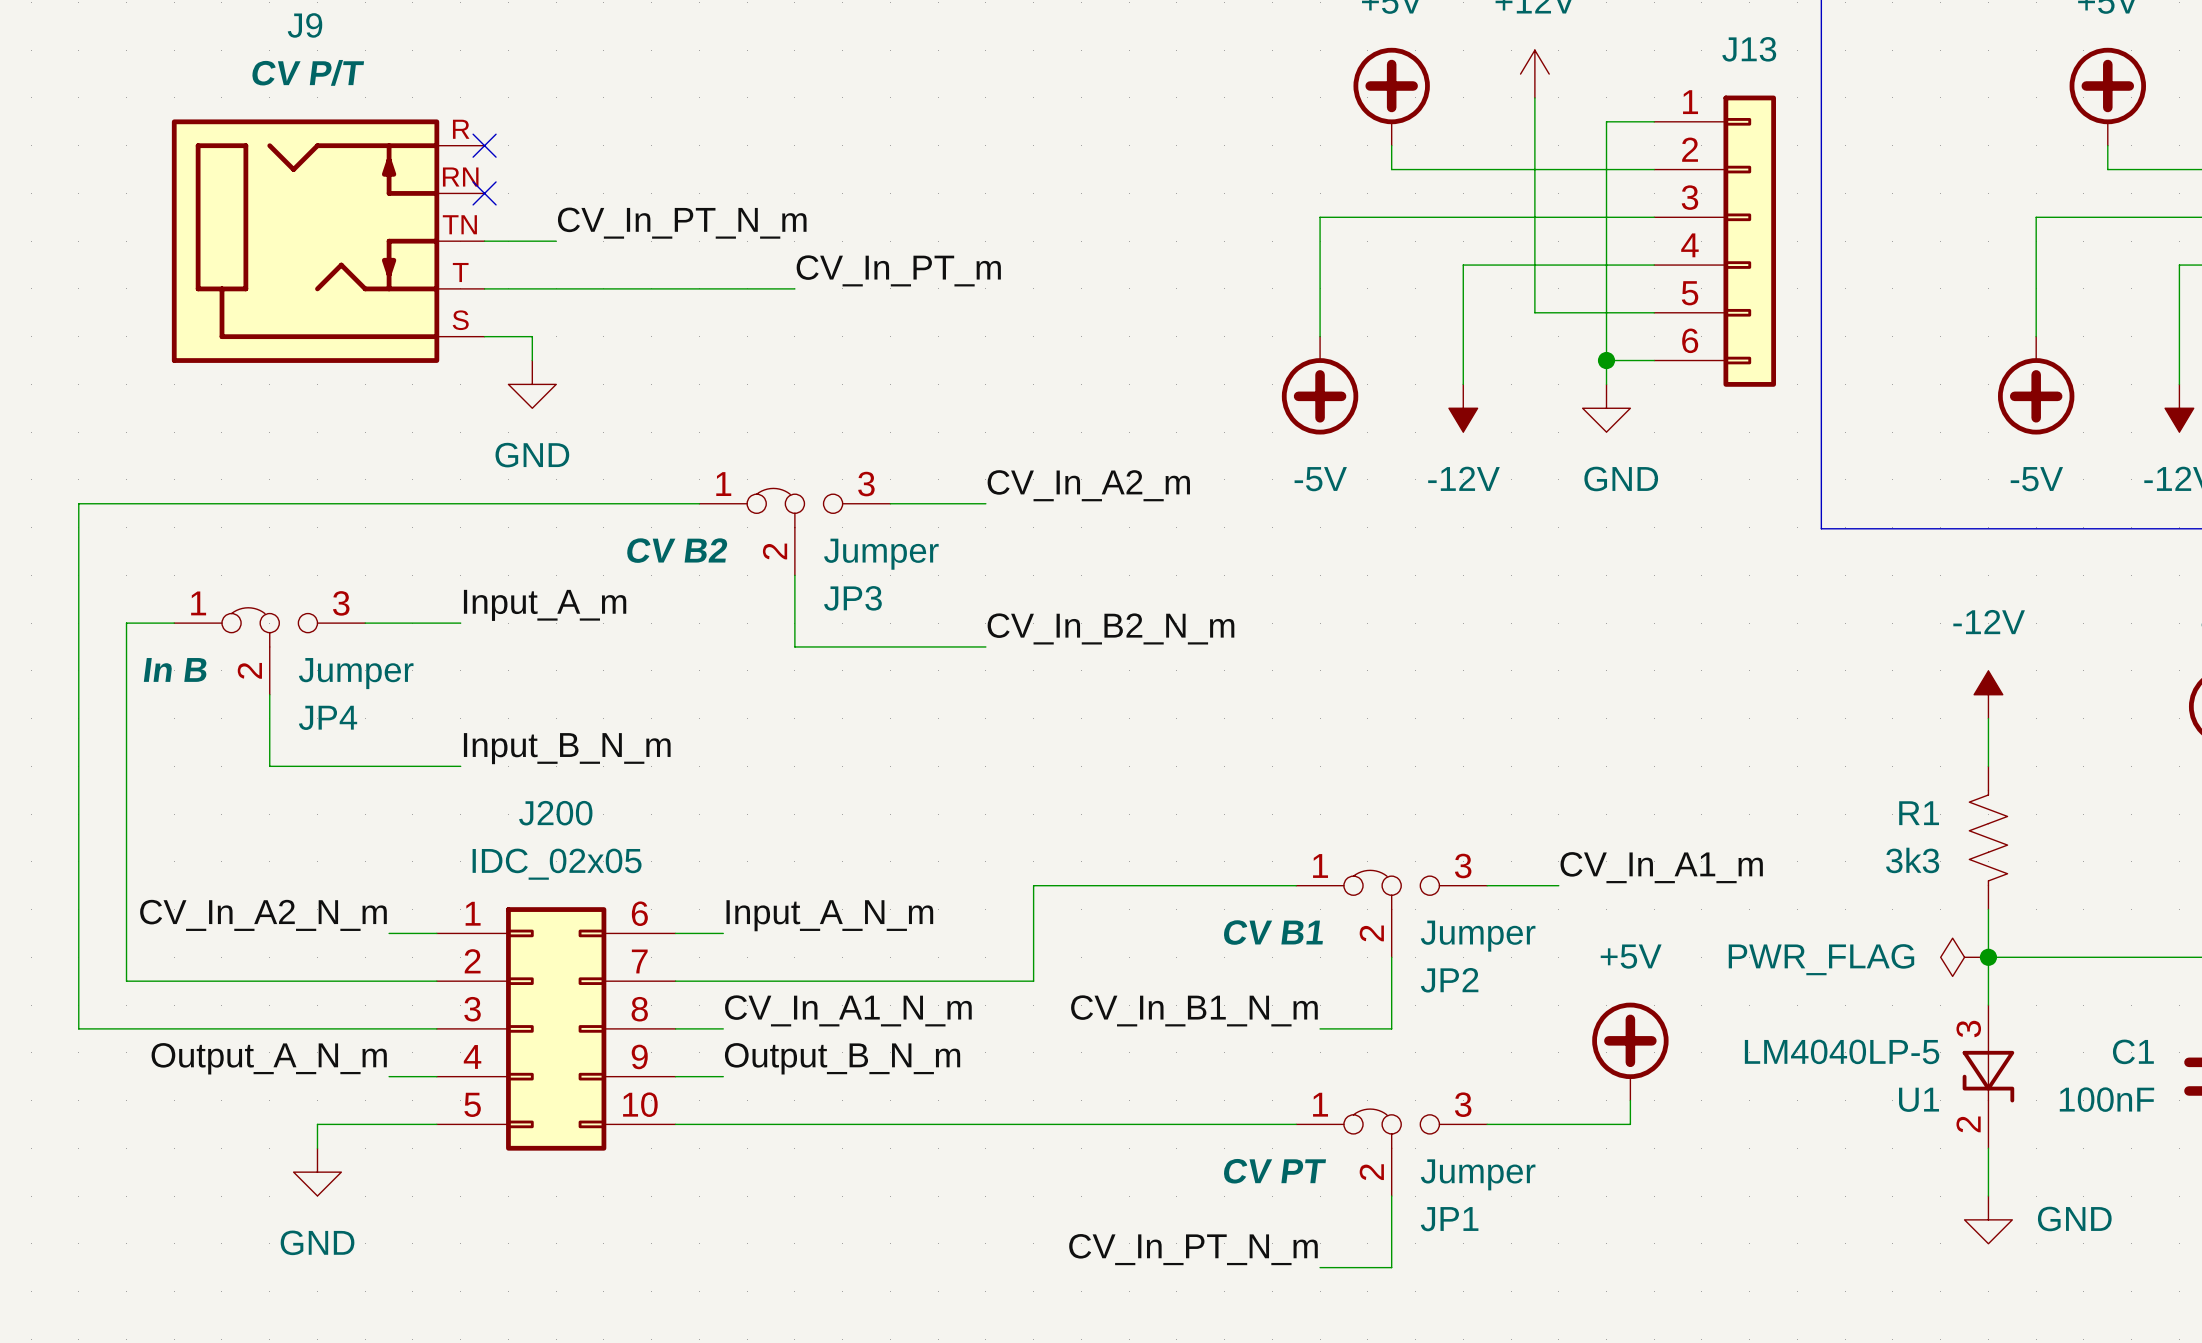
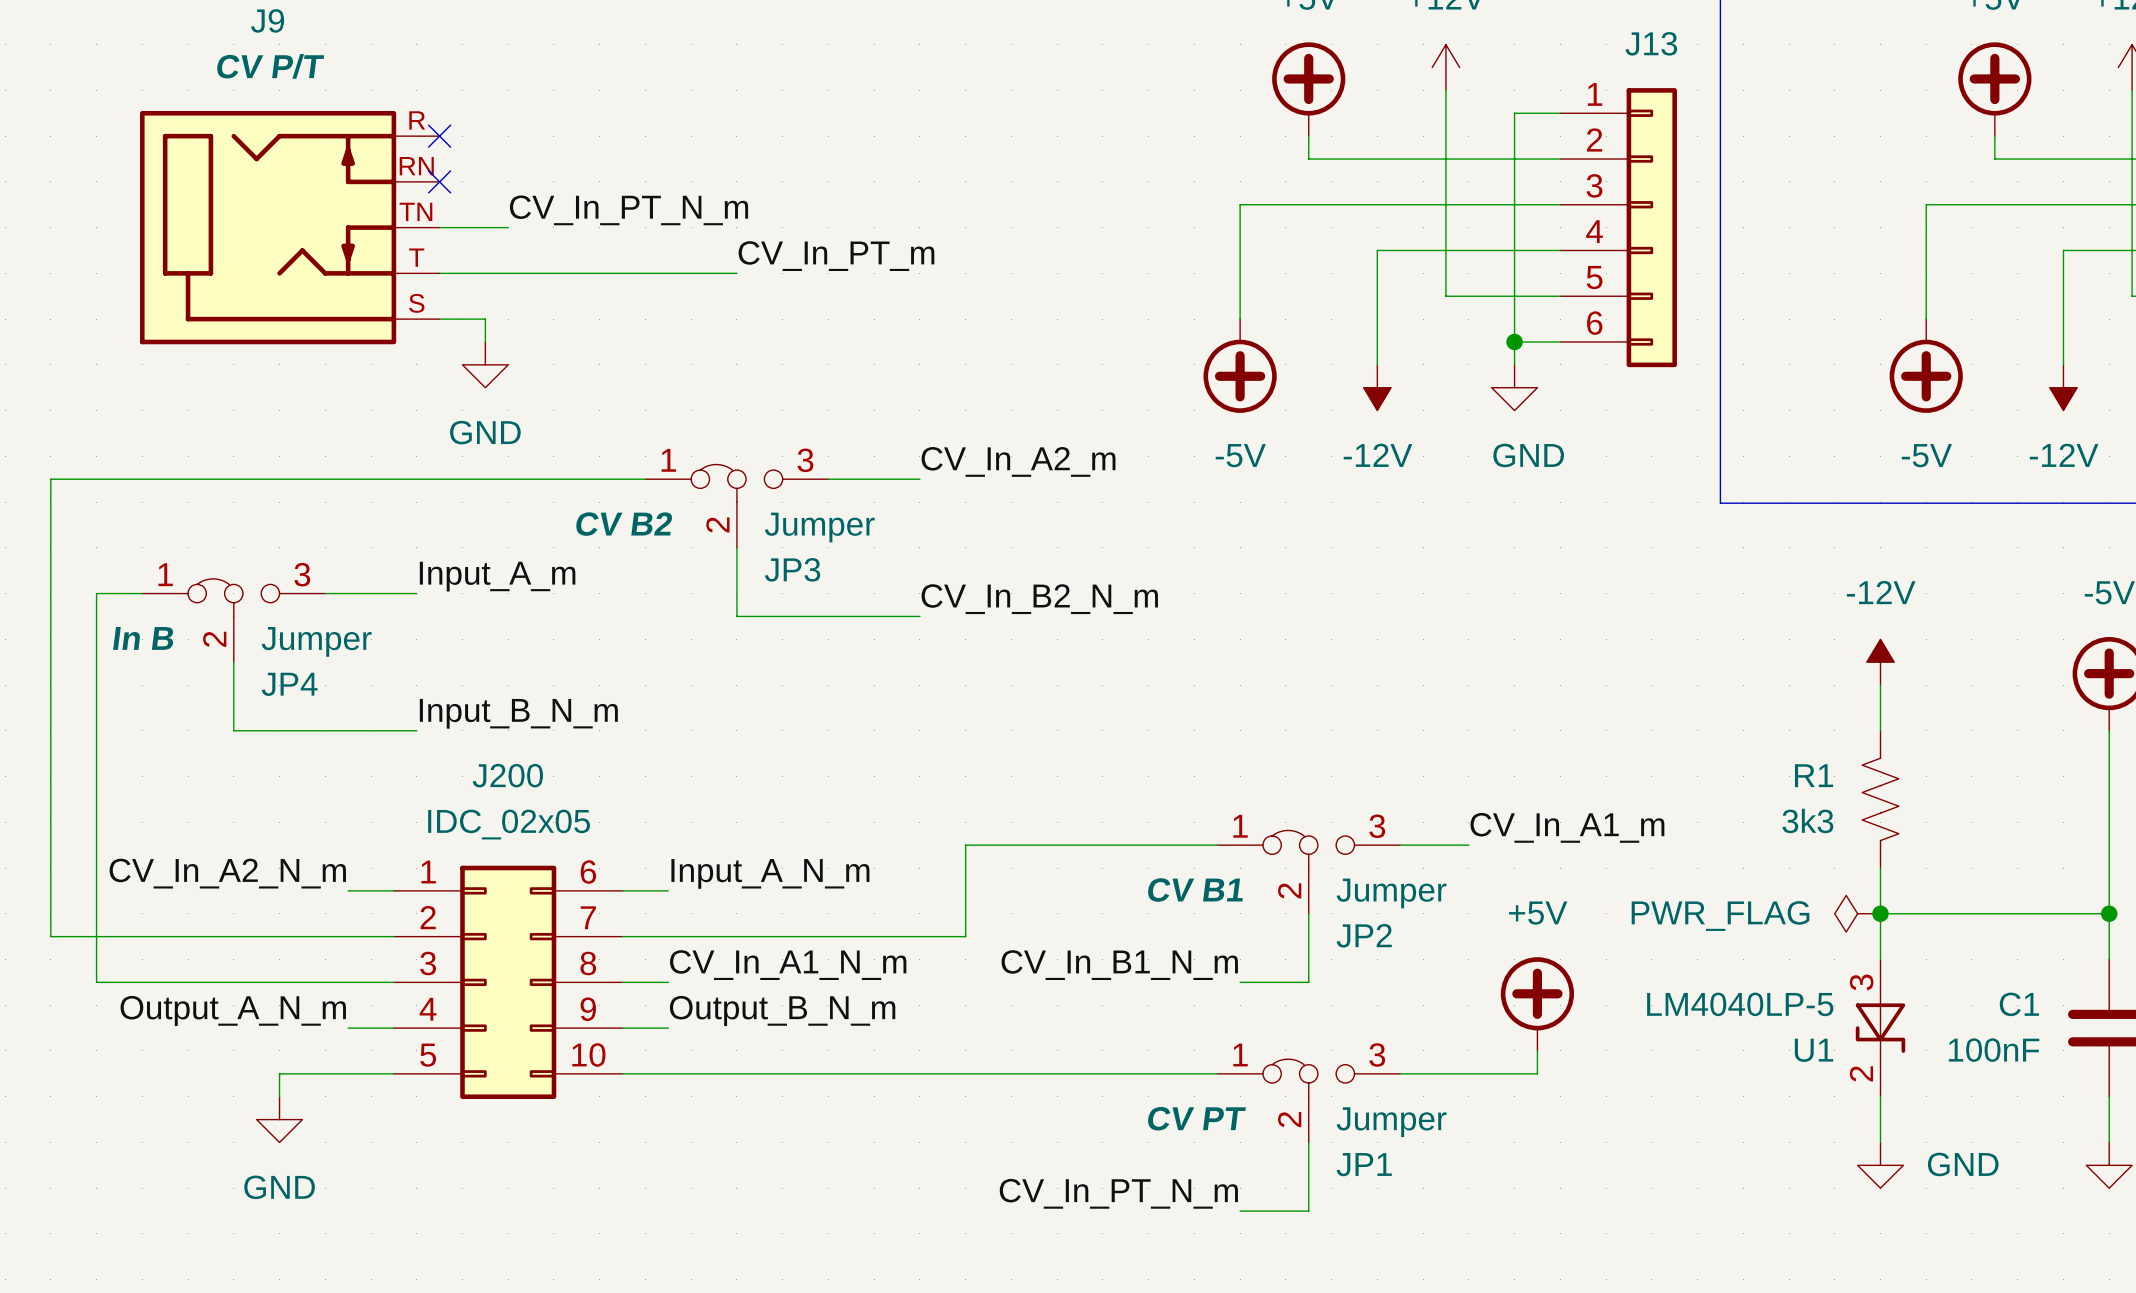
wire: (78, 981) (78, 1028) (126, 1028) -> (50, 936) (96, 936) (96, 982)

